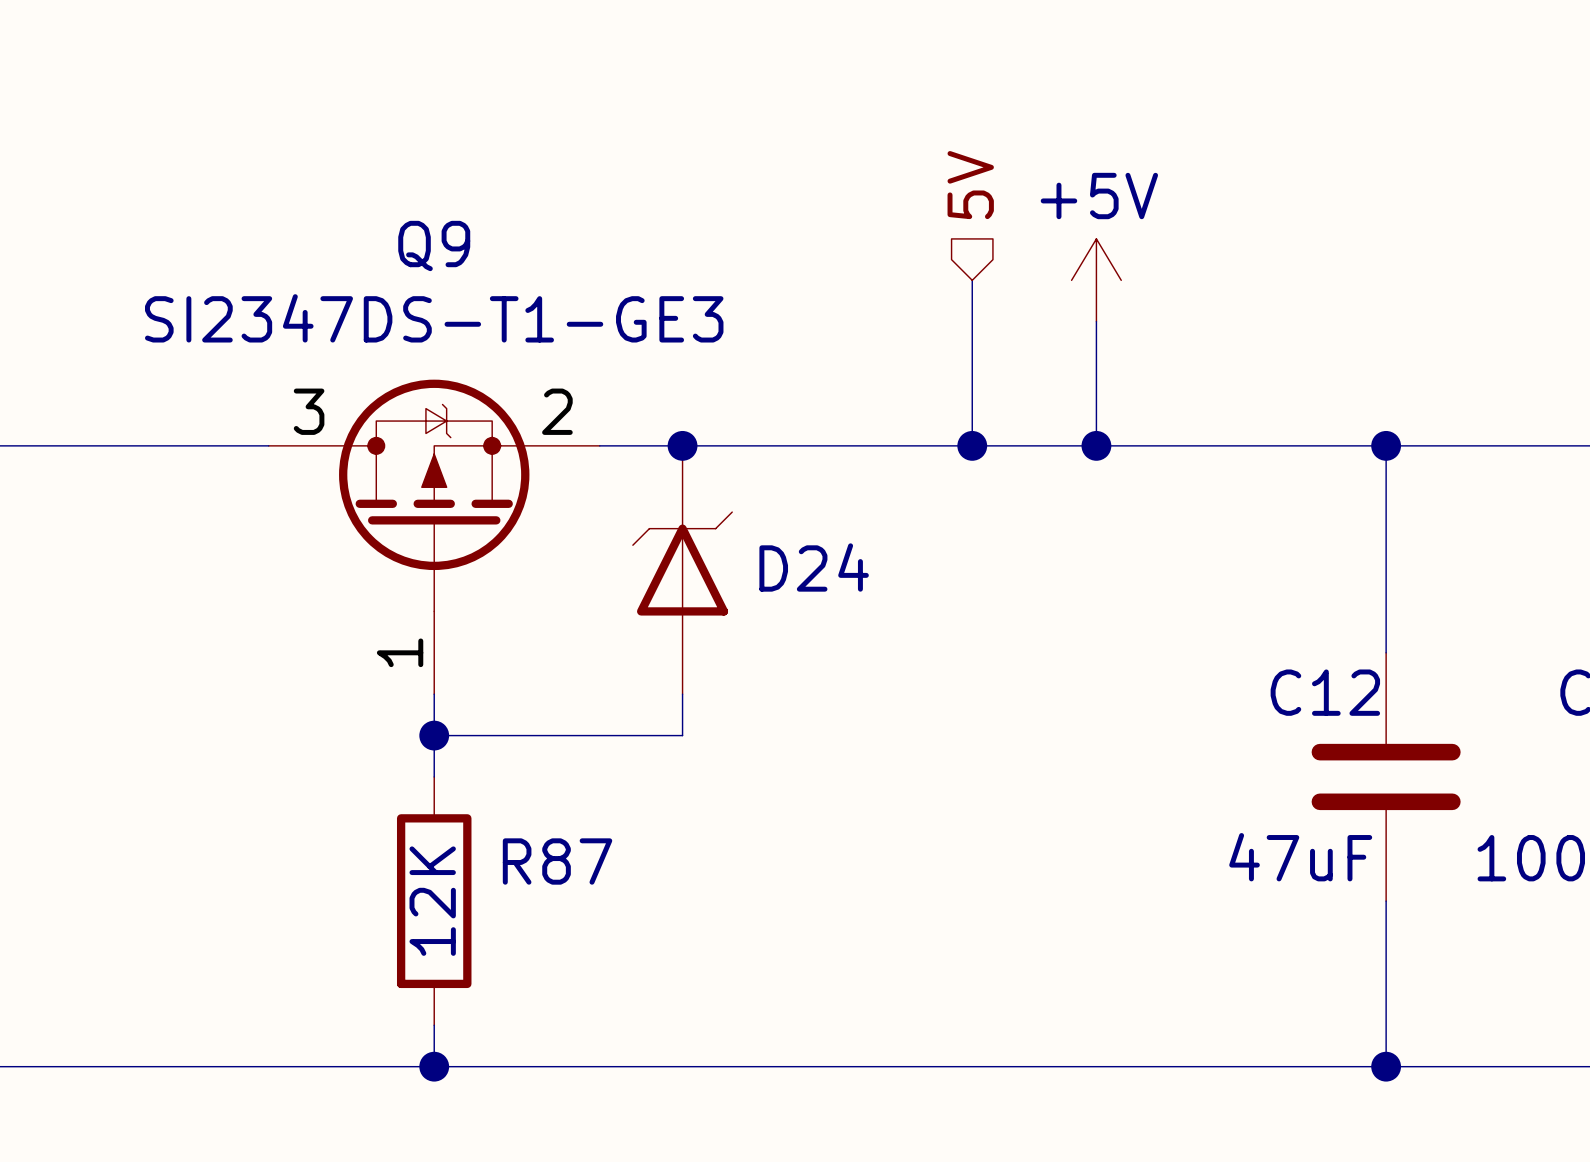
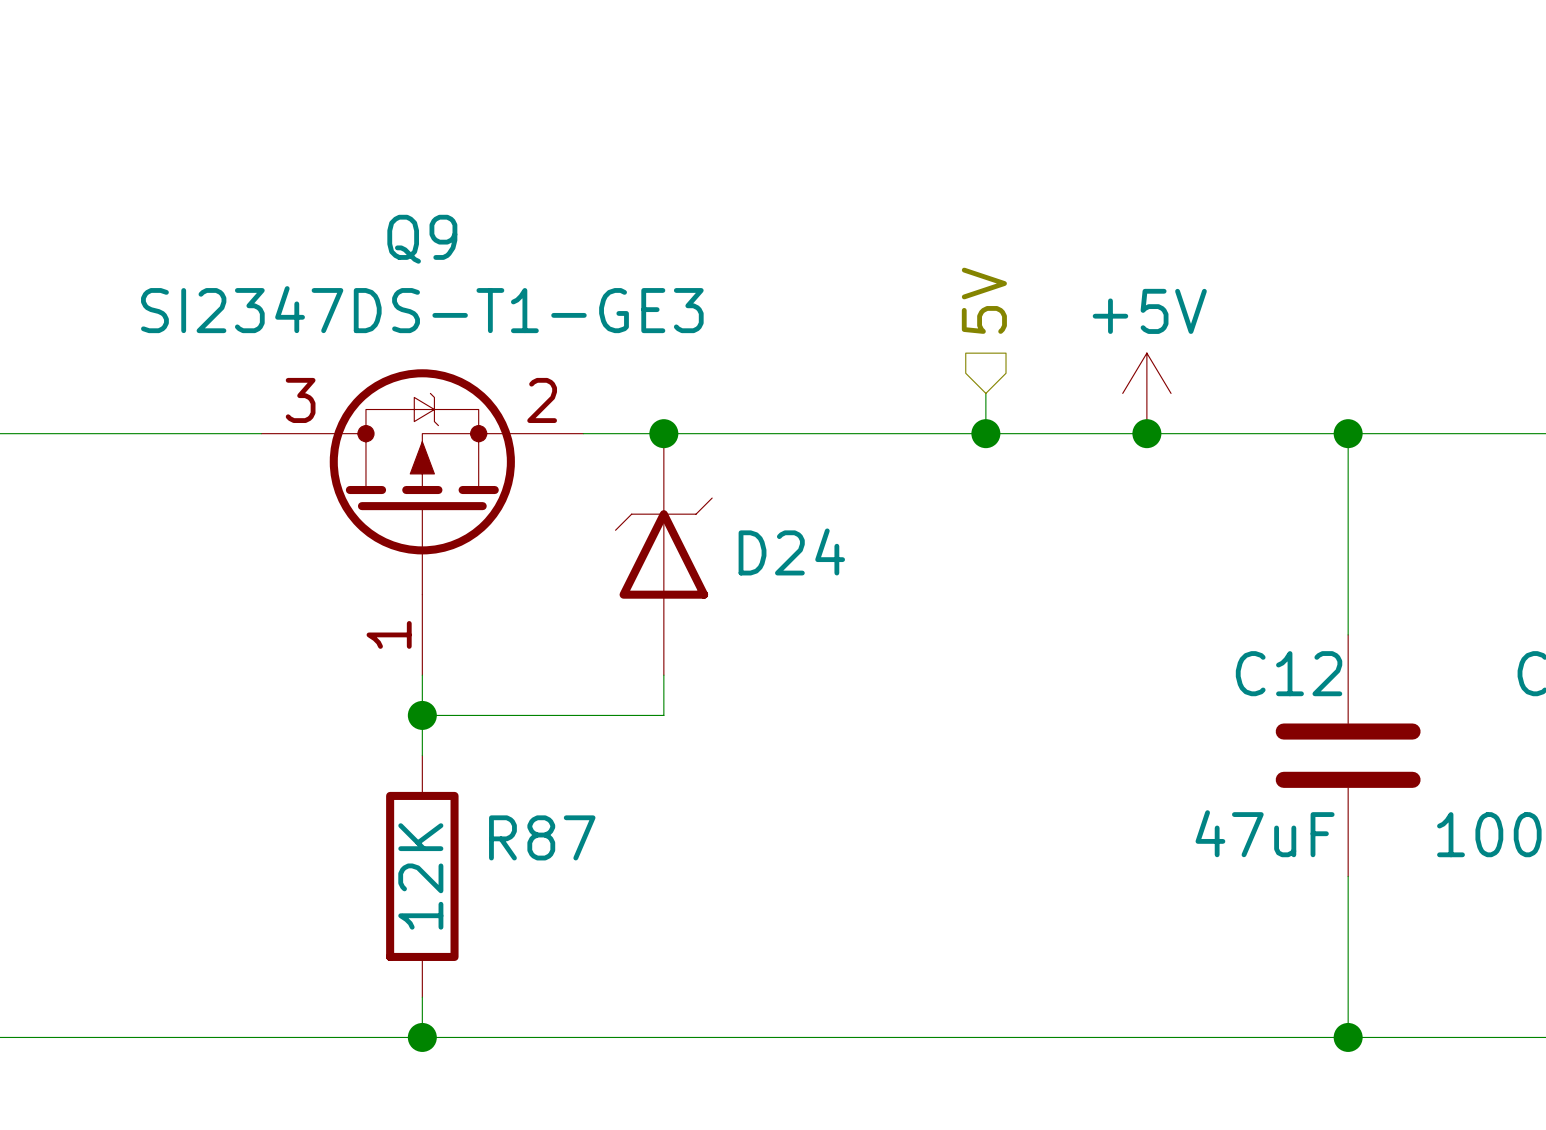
hierarchical label position: 5V (970, 185) -> 5V (984, 300)
wire: (972, 280) (972, 445) -> none
power symbol position: +5V (1096, 280) -> +5V (1146, 393)
wire: (1096, 321) (1096, 445) -> none
wire: none -> (985, 393) (985, 433)
junction: (972, 445) -> none
junction: none -> (985, 433)
junction: (1096, 445) -> none
junction: none -> (1146, 433)

